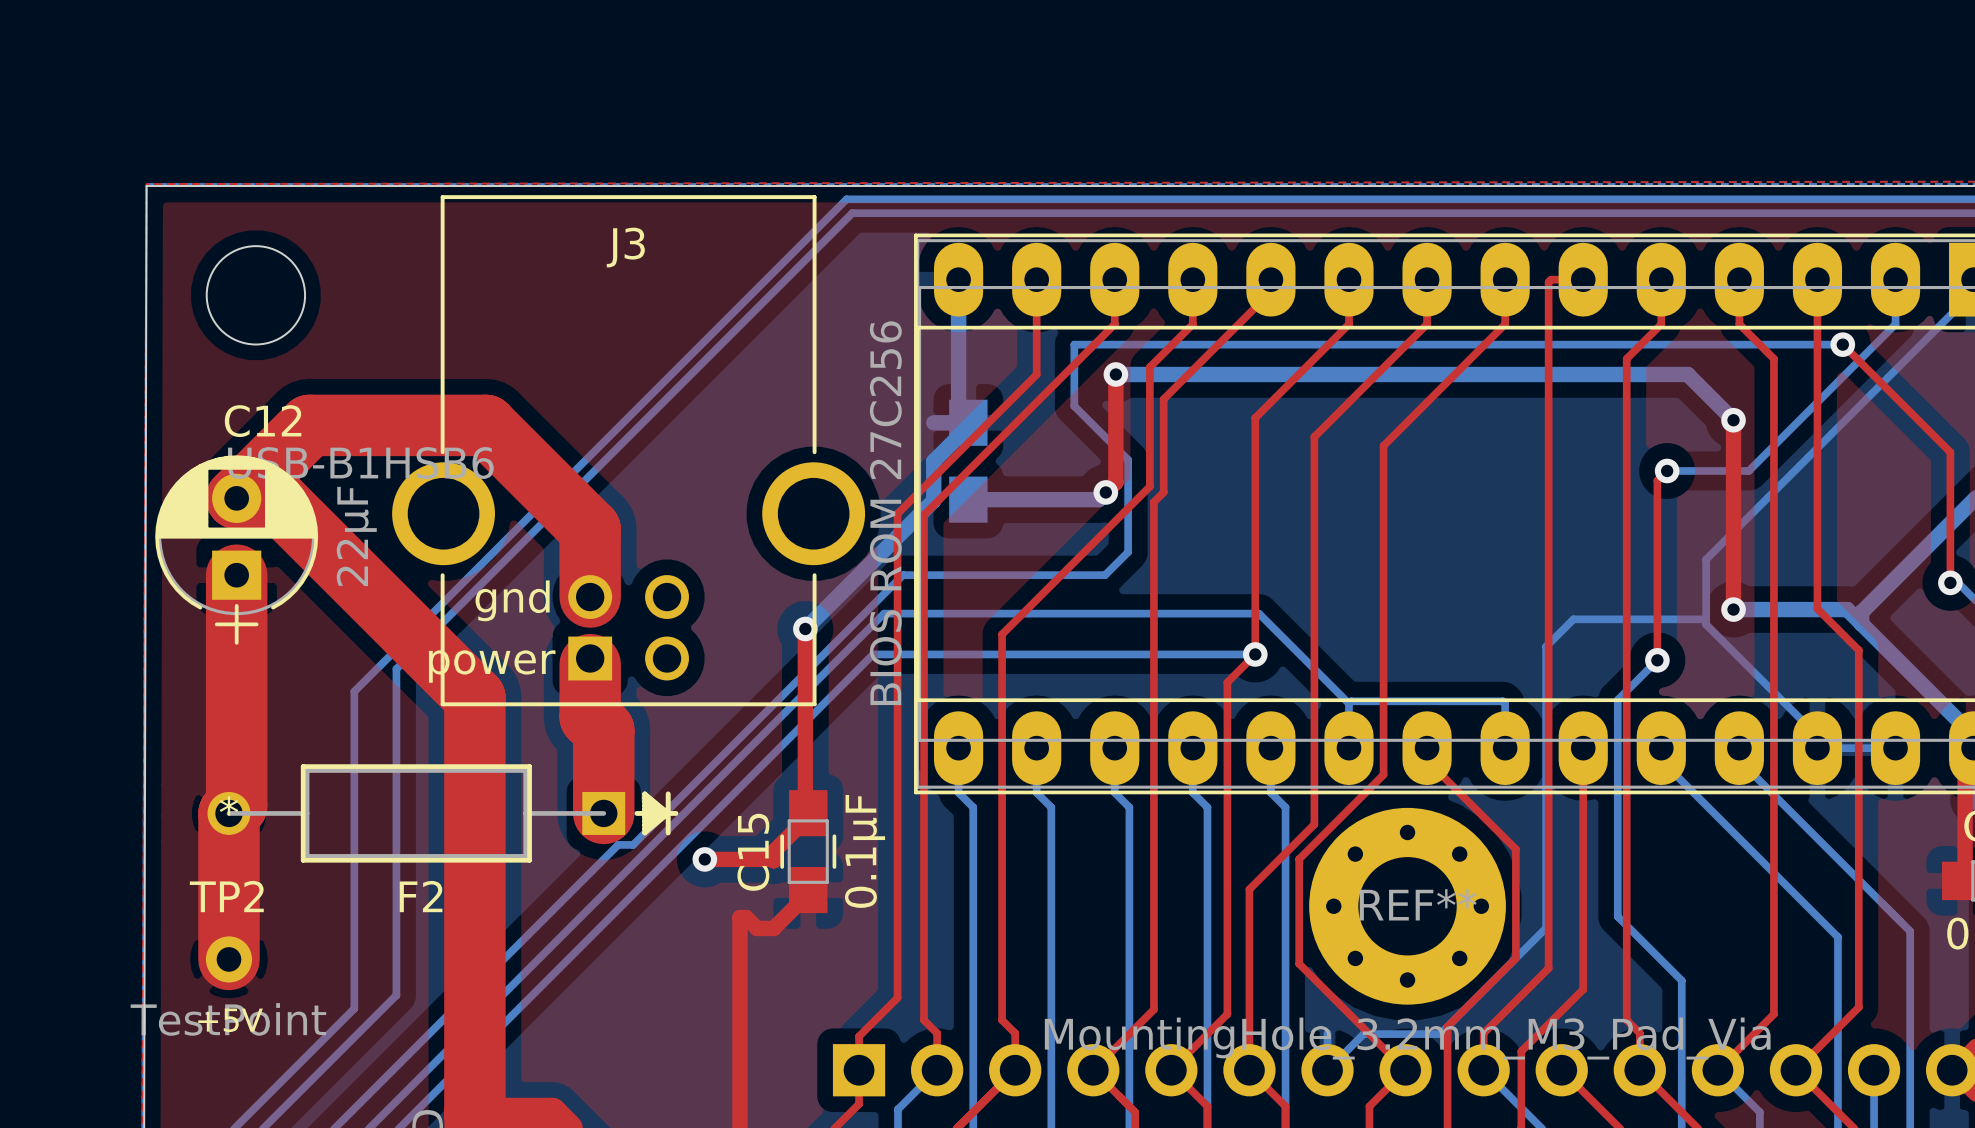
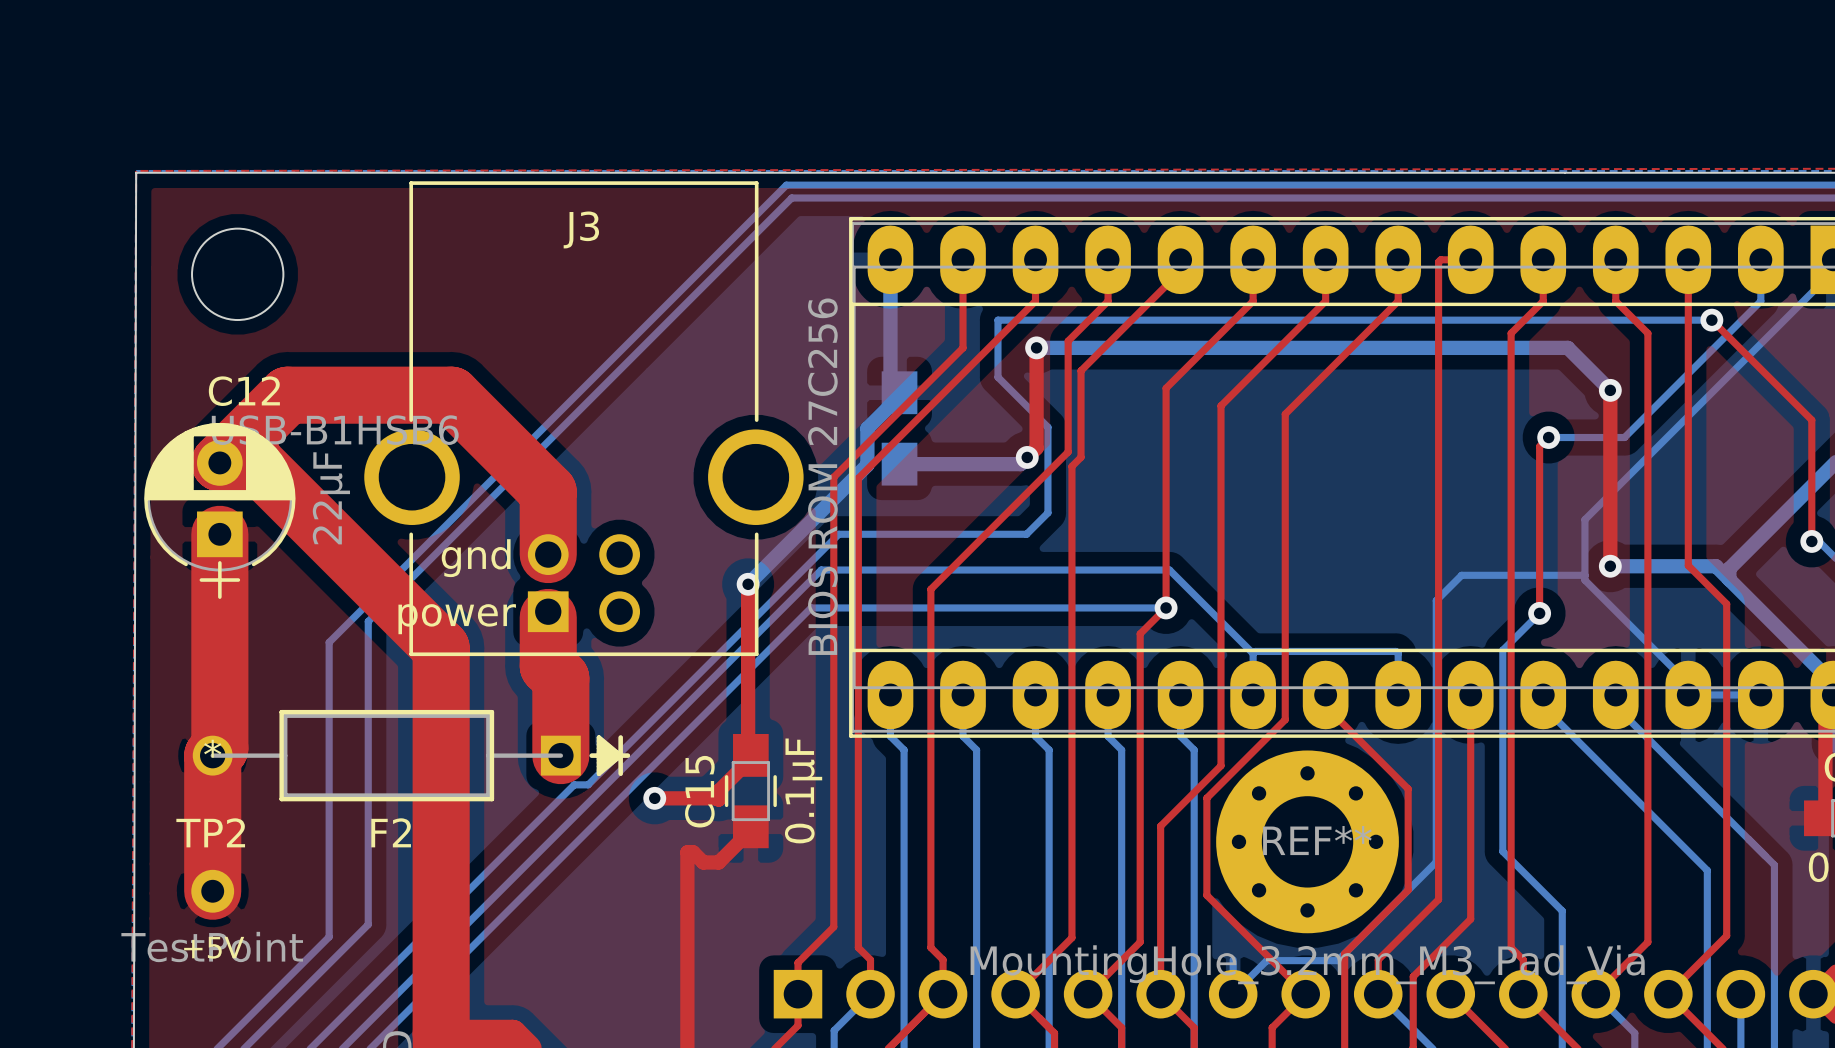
bottom track: (933, 422) (968, 422) -> none

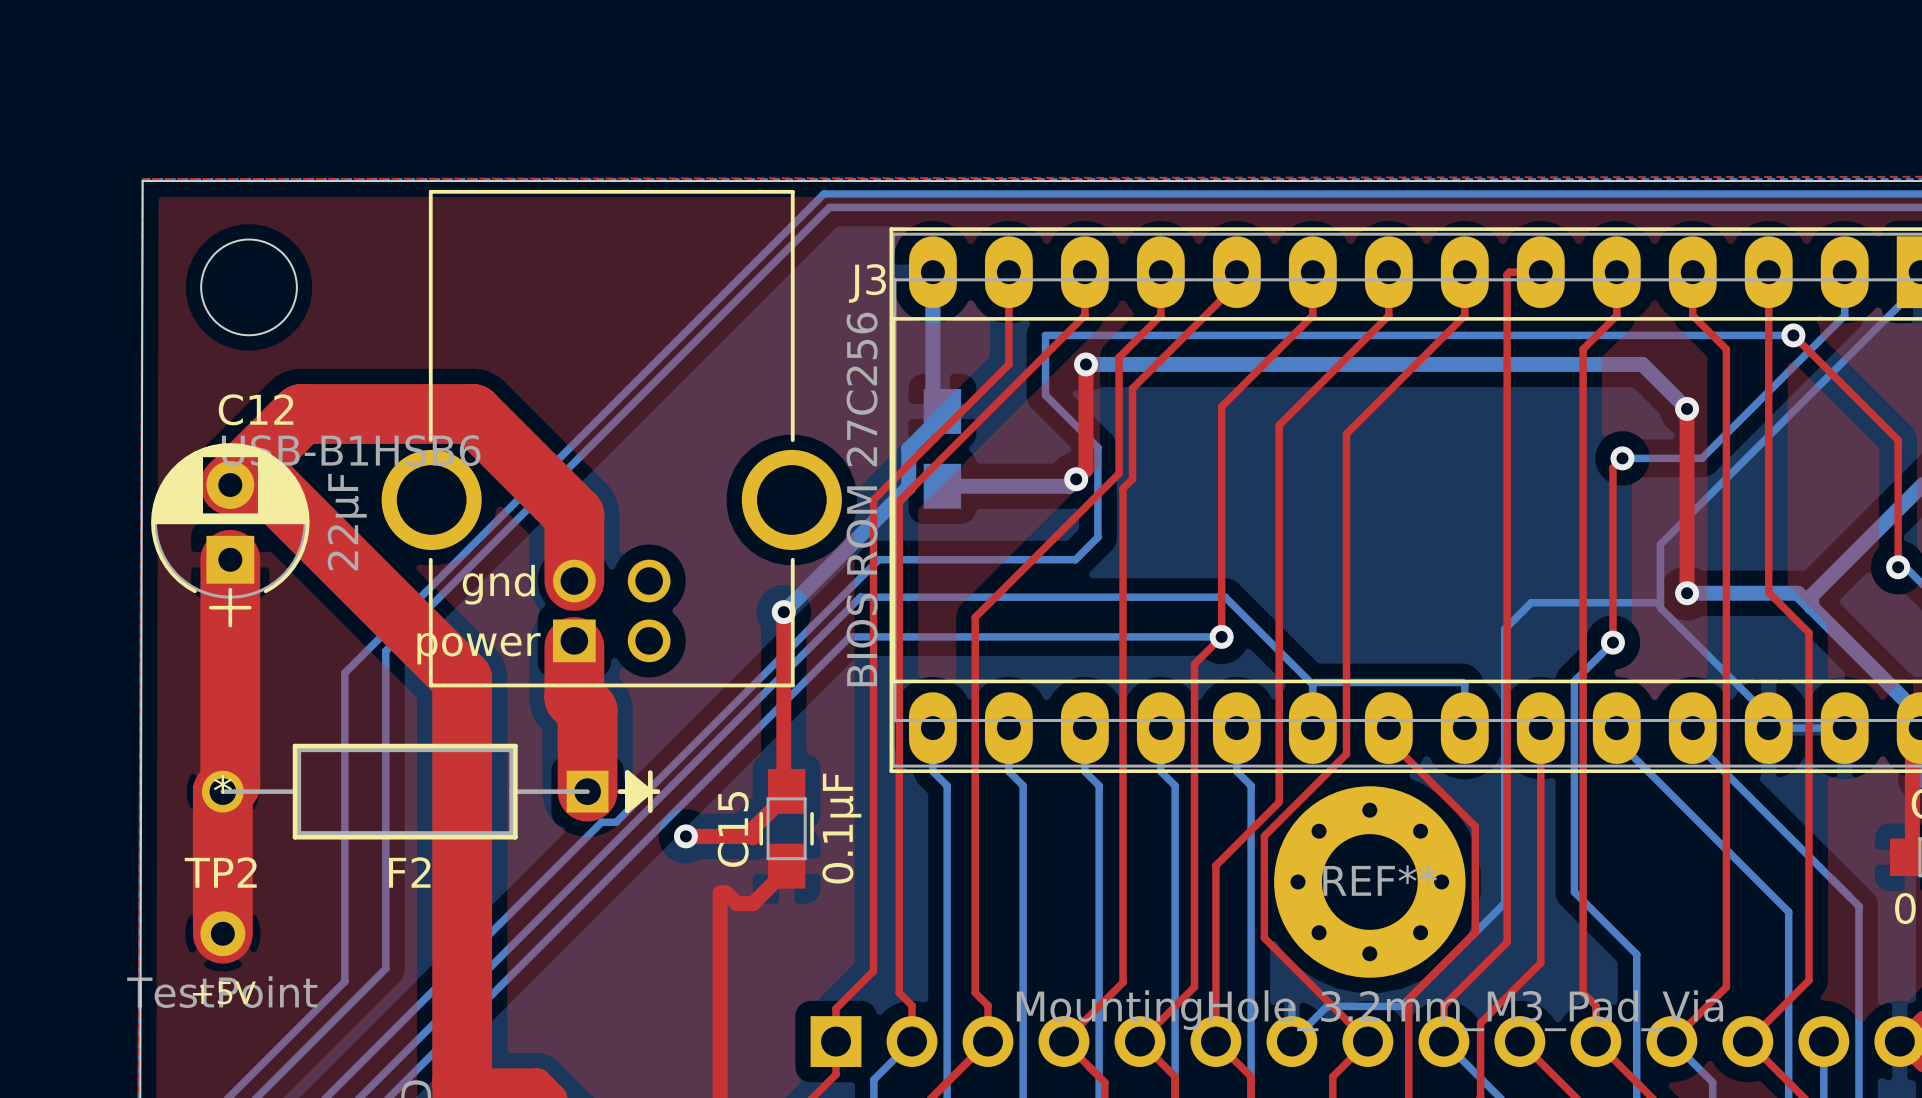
J3 name position: J3 (581, 229) -> J3 (867, 283)

